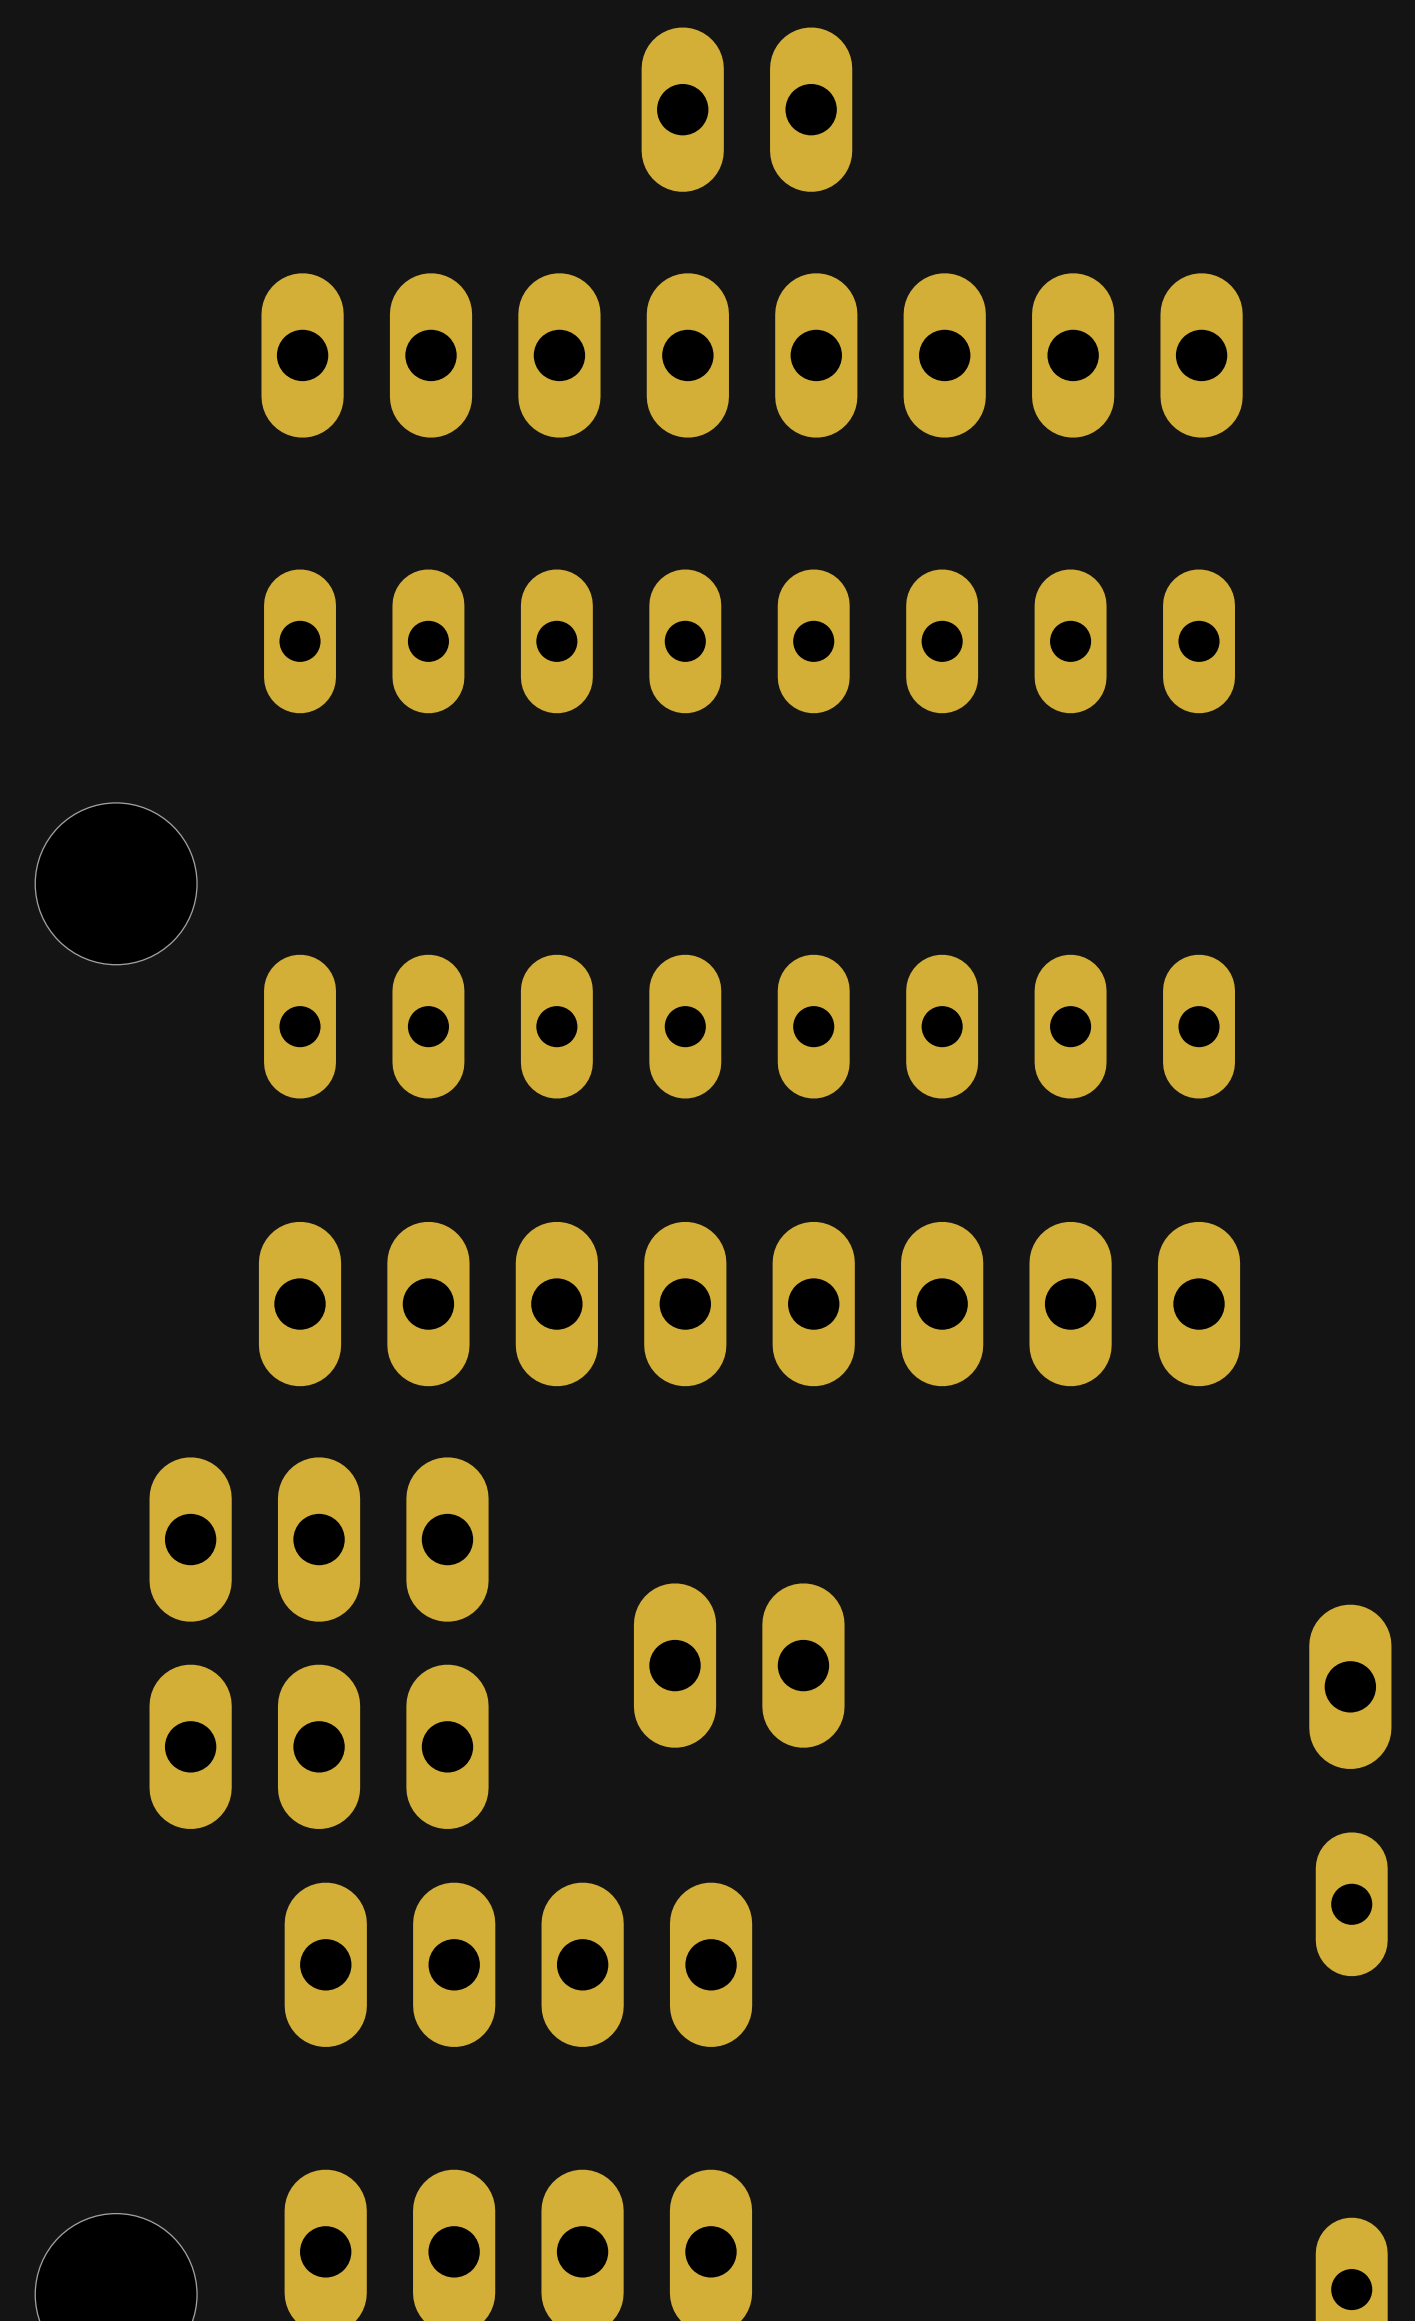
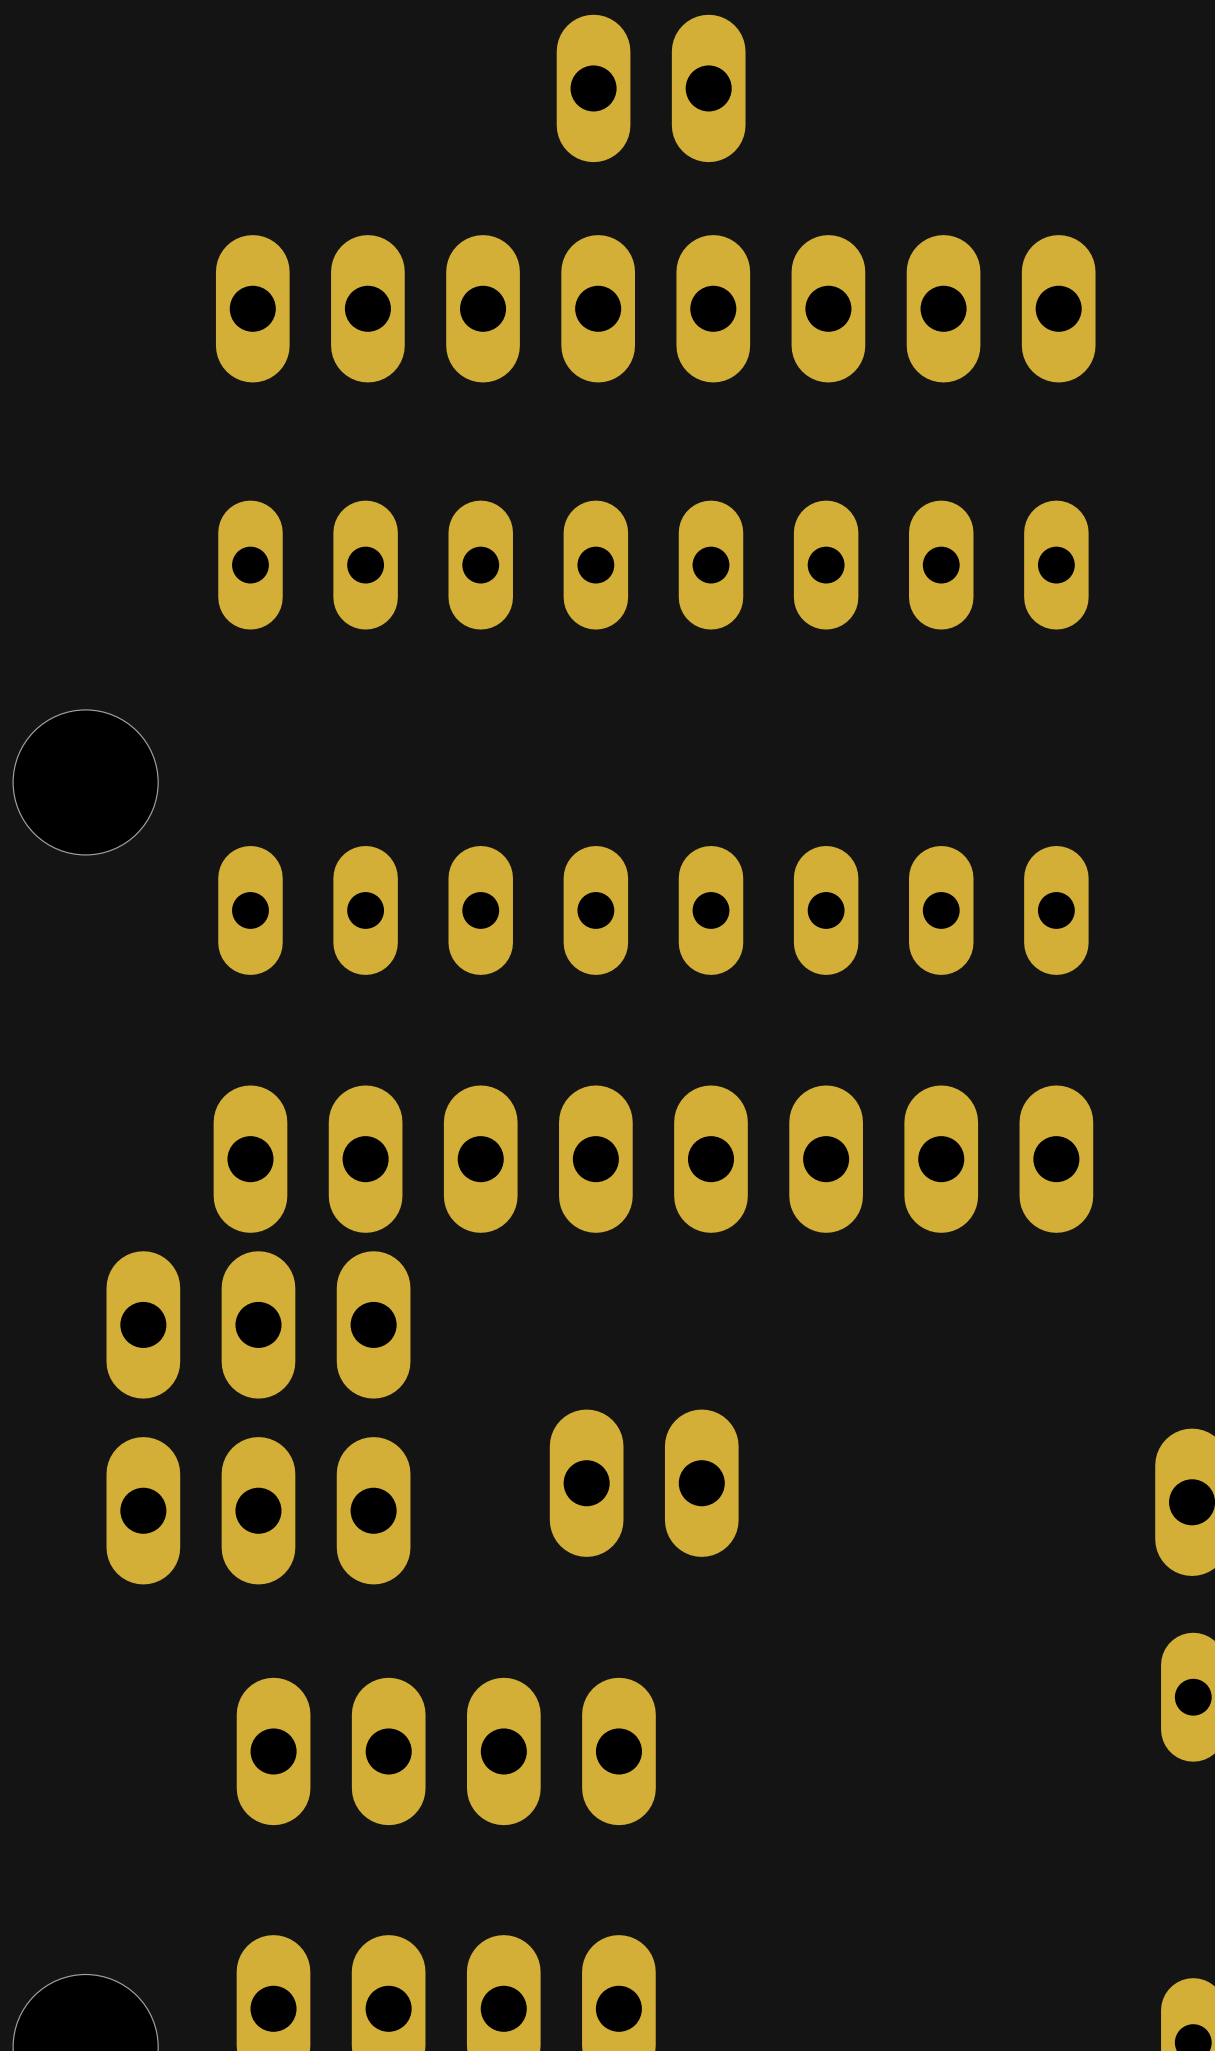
part position: (319, 1539) -> (258, 1324)
part position: (319, 1746) -> (258, 1510)

